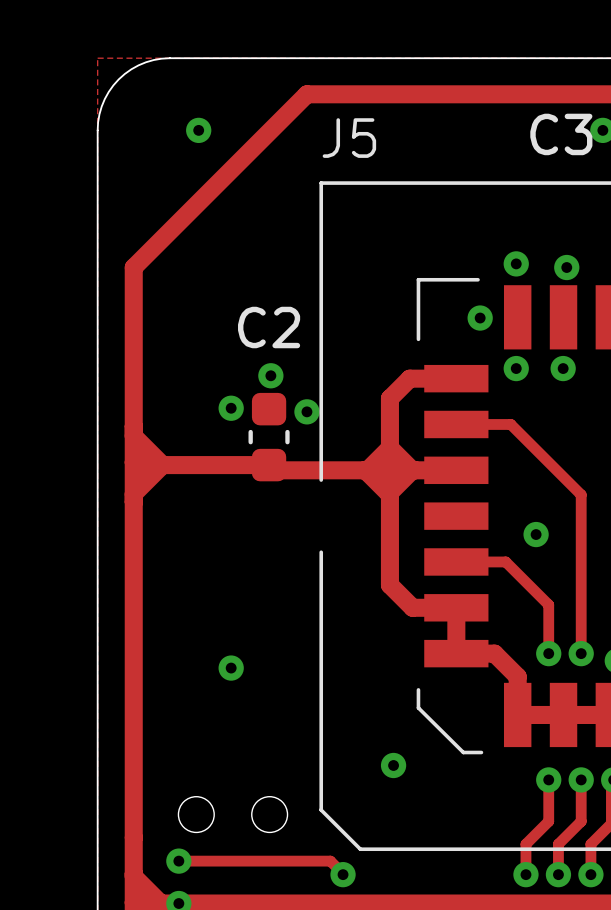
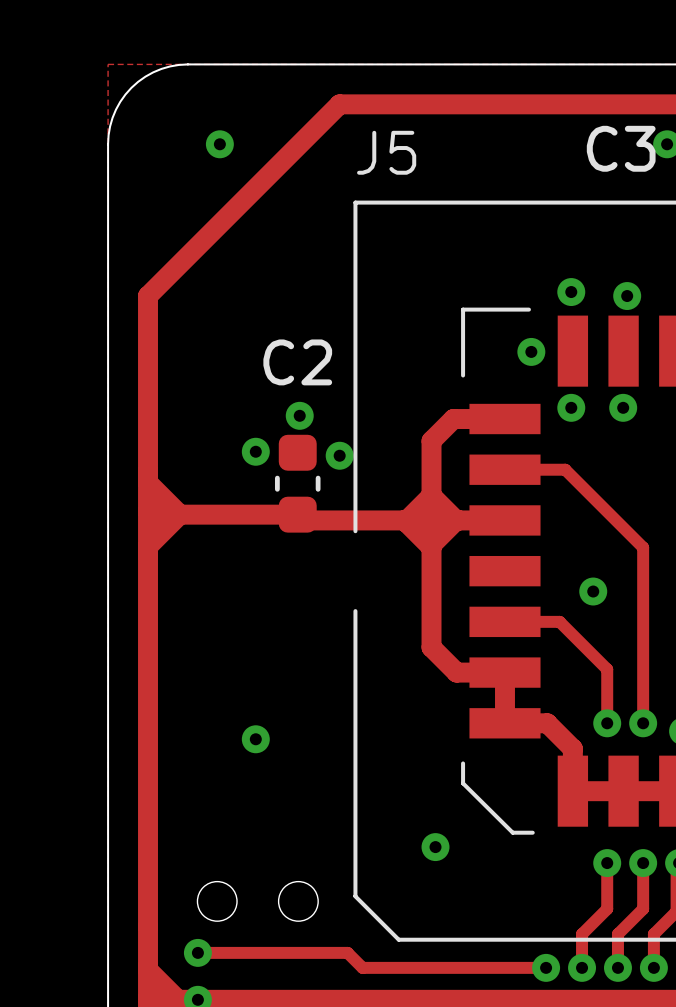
track: (314, 861) (330, 861) (343, 874) -> (347, 952) (362, 967) (546, 967)
via position: (343, 874) -> (546, 967)

